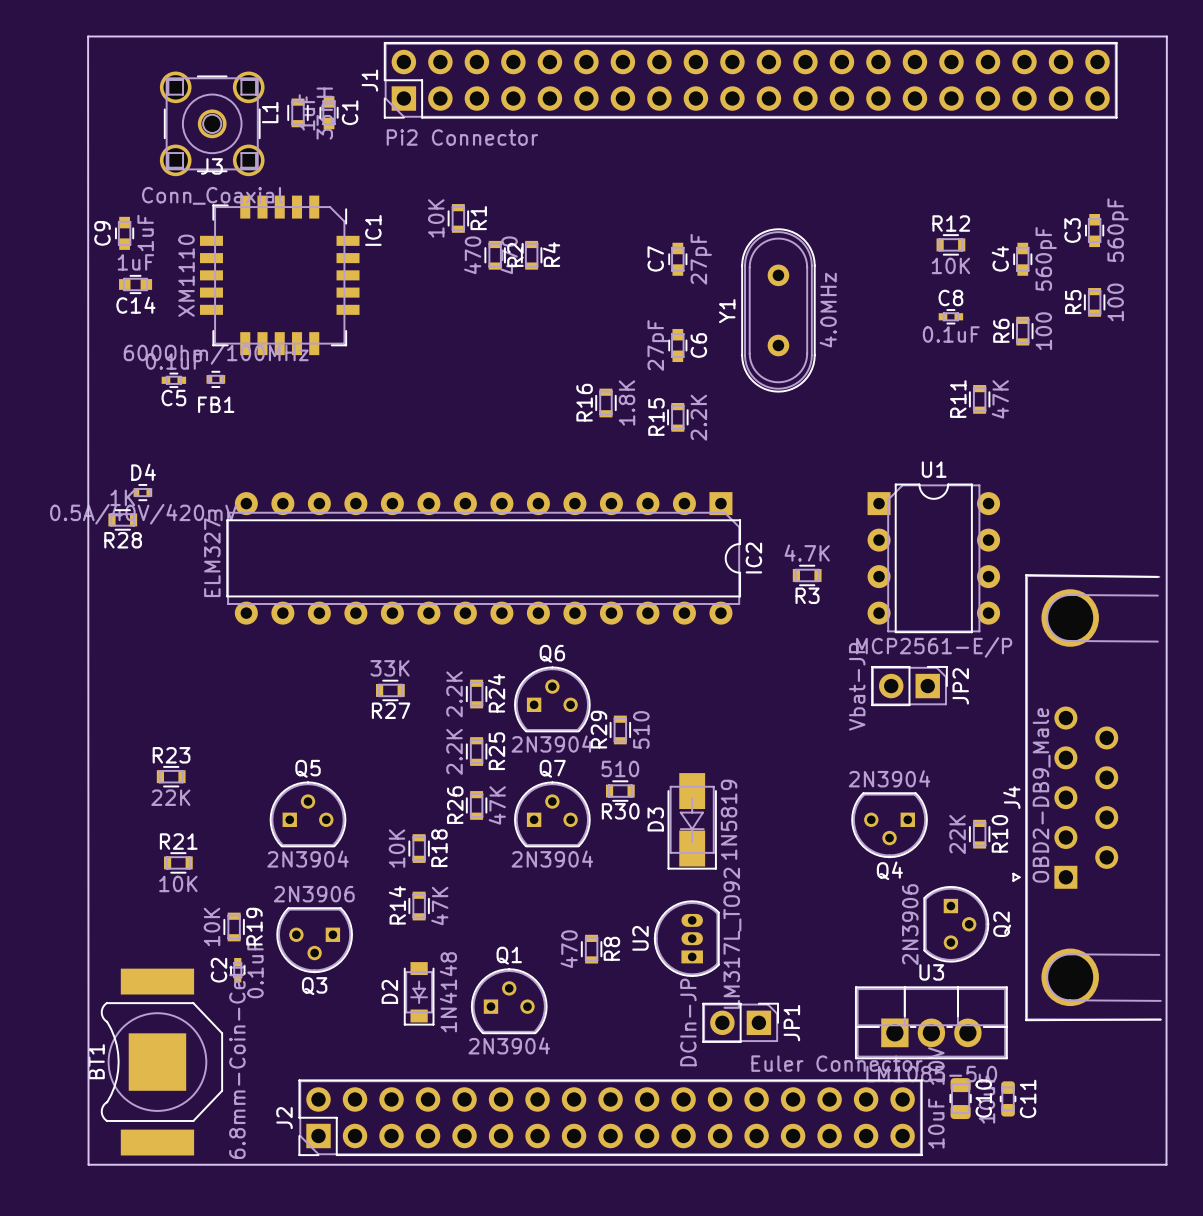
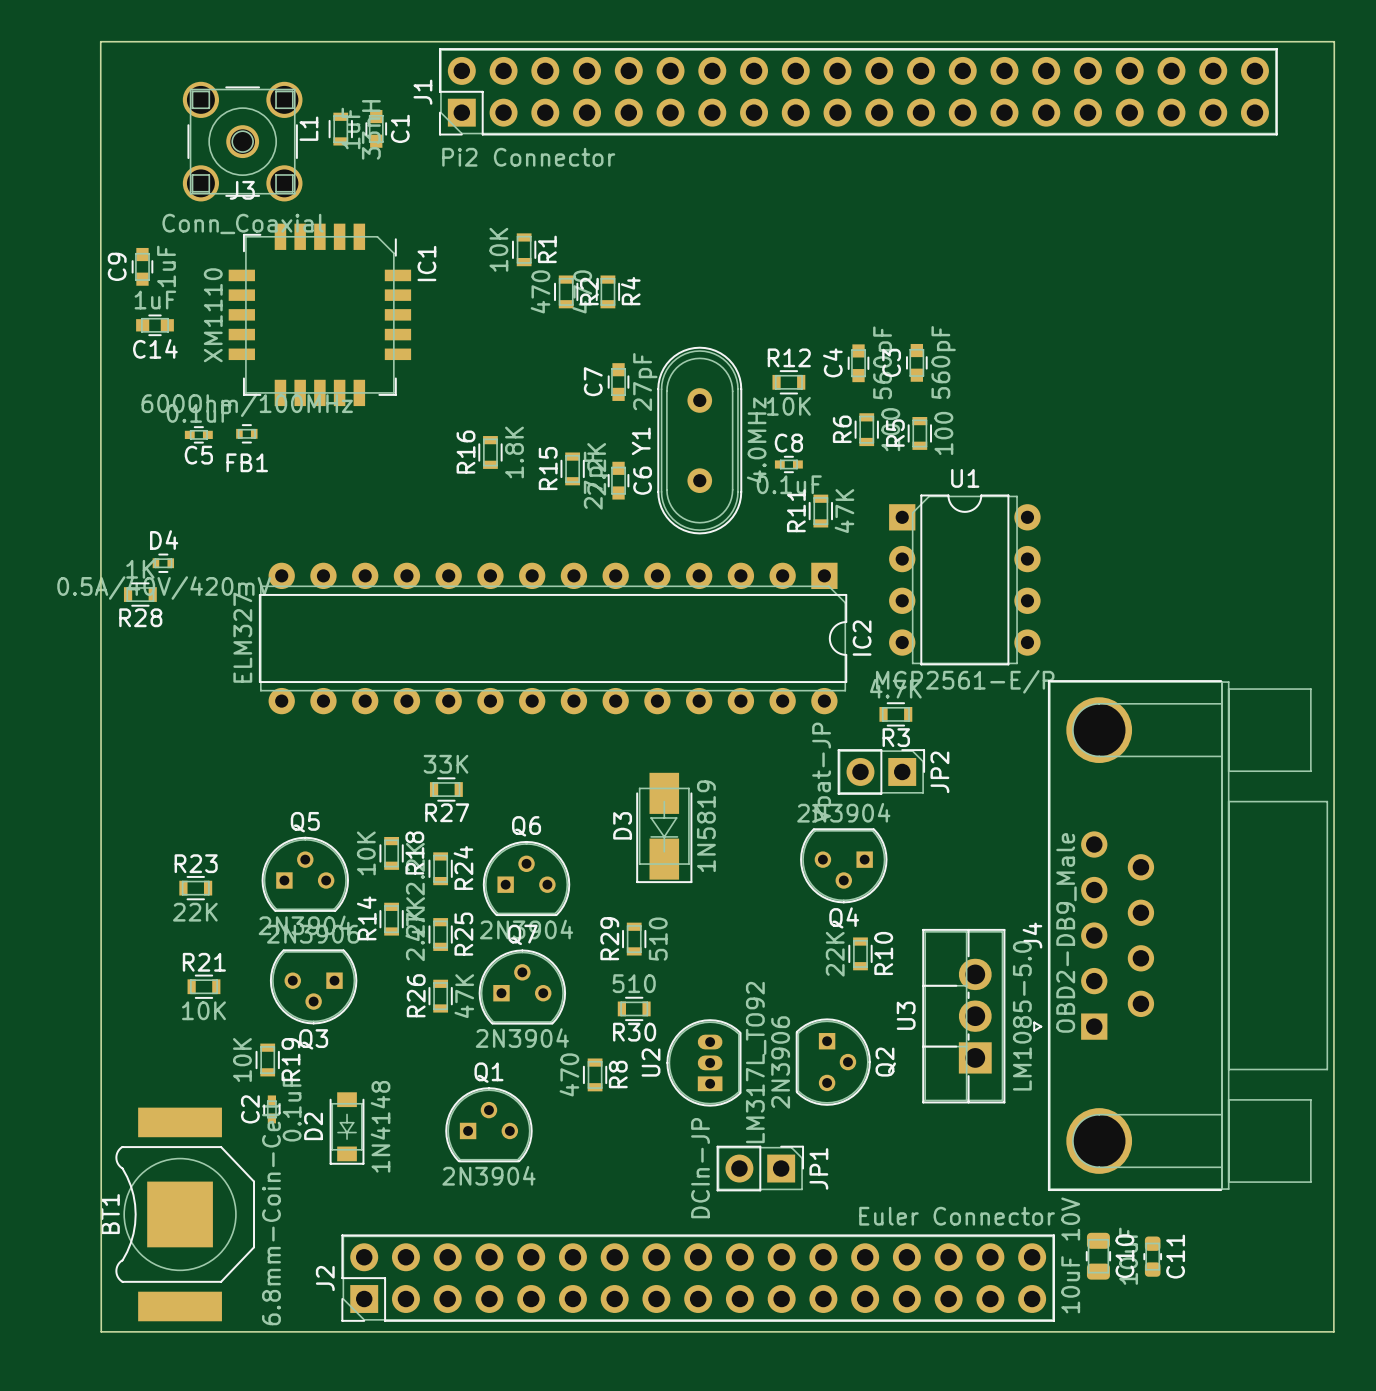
C3 position: (1094, 230) -> (916, 362)
R12 position: (950, 244) -> (788, 382)
C7 position: (677, 259) -> (618, 382)
C4 position: (1022, 259) -> (858, 363)
R5 position: (1094, 302) -> (919, 433)
Y1 position: (778, 310) -> (699, 440)
C8 position: (950, 316) -> (788, 464)
R6 position: (1022, 331) -> (866, 429)
C6 position: (677, 345) -> (618, 480)
R11 position: (979, 399) -> (820, 511)
R16 position: (605, 402) -> (490, 452)
R15 position: (677, 417) -> (572, 468)
U1 position: (933, 558) -> (964, 579)
J4 footprint: [1012, 574, 1162, 1022] -> [1033, 680, 1329, 1192]
R3 position: (807, 575) -> (895, 714)
JP2 position: (909, 686) -> (881, 771)
R24 position: (476, 694) -> (440, 868)
Q6 position: (552, 699) -> (526, 878)
R29 position: (620, 729) -> (634, 939)
R25 position: (476, 751) -> (440, 934)
R30 position: (620, 791) -> (634, 1008)
J4 value position: OBD2-DB9_Male (1041, 795) -> OBD2-DB9_Male (1066, 932)
J4 name position: J4 (1011, 797) -> J4 (1032, 935)
R26 position: (476, 805) -> (440, 996)
Q5 position: (308, 814) -> (305, 874)
Q7 position: (552, 814) -> (522, 987)
D3 position: (692, 821) -> (664, 827)
Q4 position: (889, 825) -> (843, 865)
R10 position: (979, 834) -> (860, 953)
R18 position: (419, 848) -> (391, 853)
R14 position: (419, 906) -> (391, 919)
Q2 position: (956, 924) -> (833, 1062)
U2 position: (686, 938) -> (703, 1062)
Q3 position: (314, 940) -> (313, 986)
R8 position: (591, 949) -> (595, 1074)
D2 position: (419, 993) -> (347, 1128)
Q1 position: (509, 1001) -> (488, 1124)
JP1 position: (740, 1022) -> (760, 1168)
U3 rotation: 0° (931, 1022) -> 90° counterclockwise (963, 1016)
U3 position: (931, 1022) -> (963, 1016)

